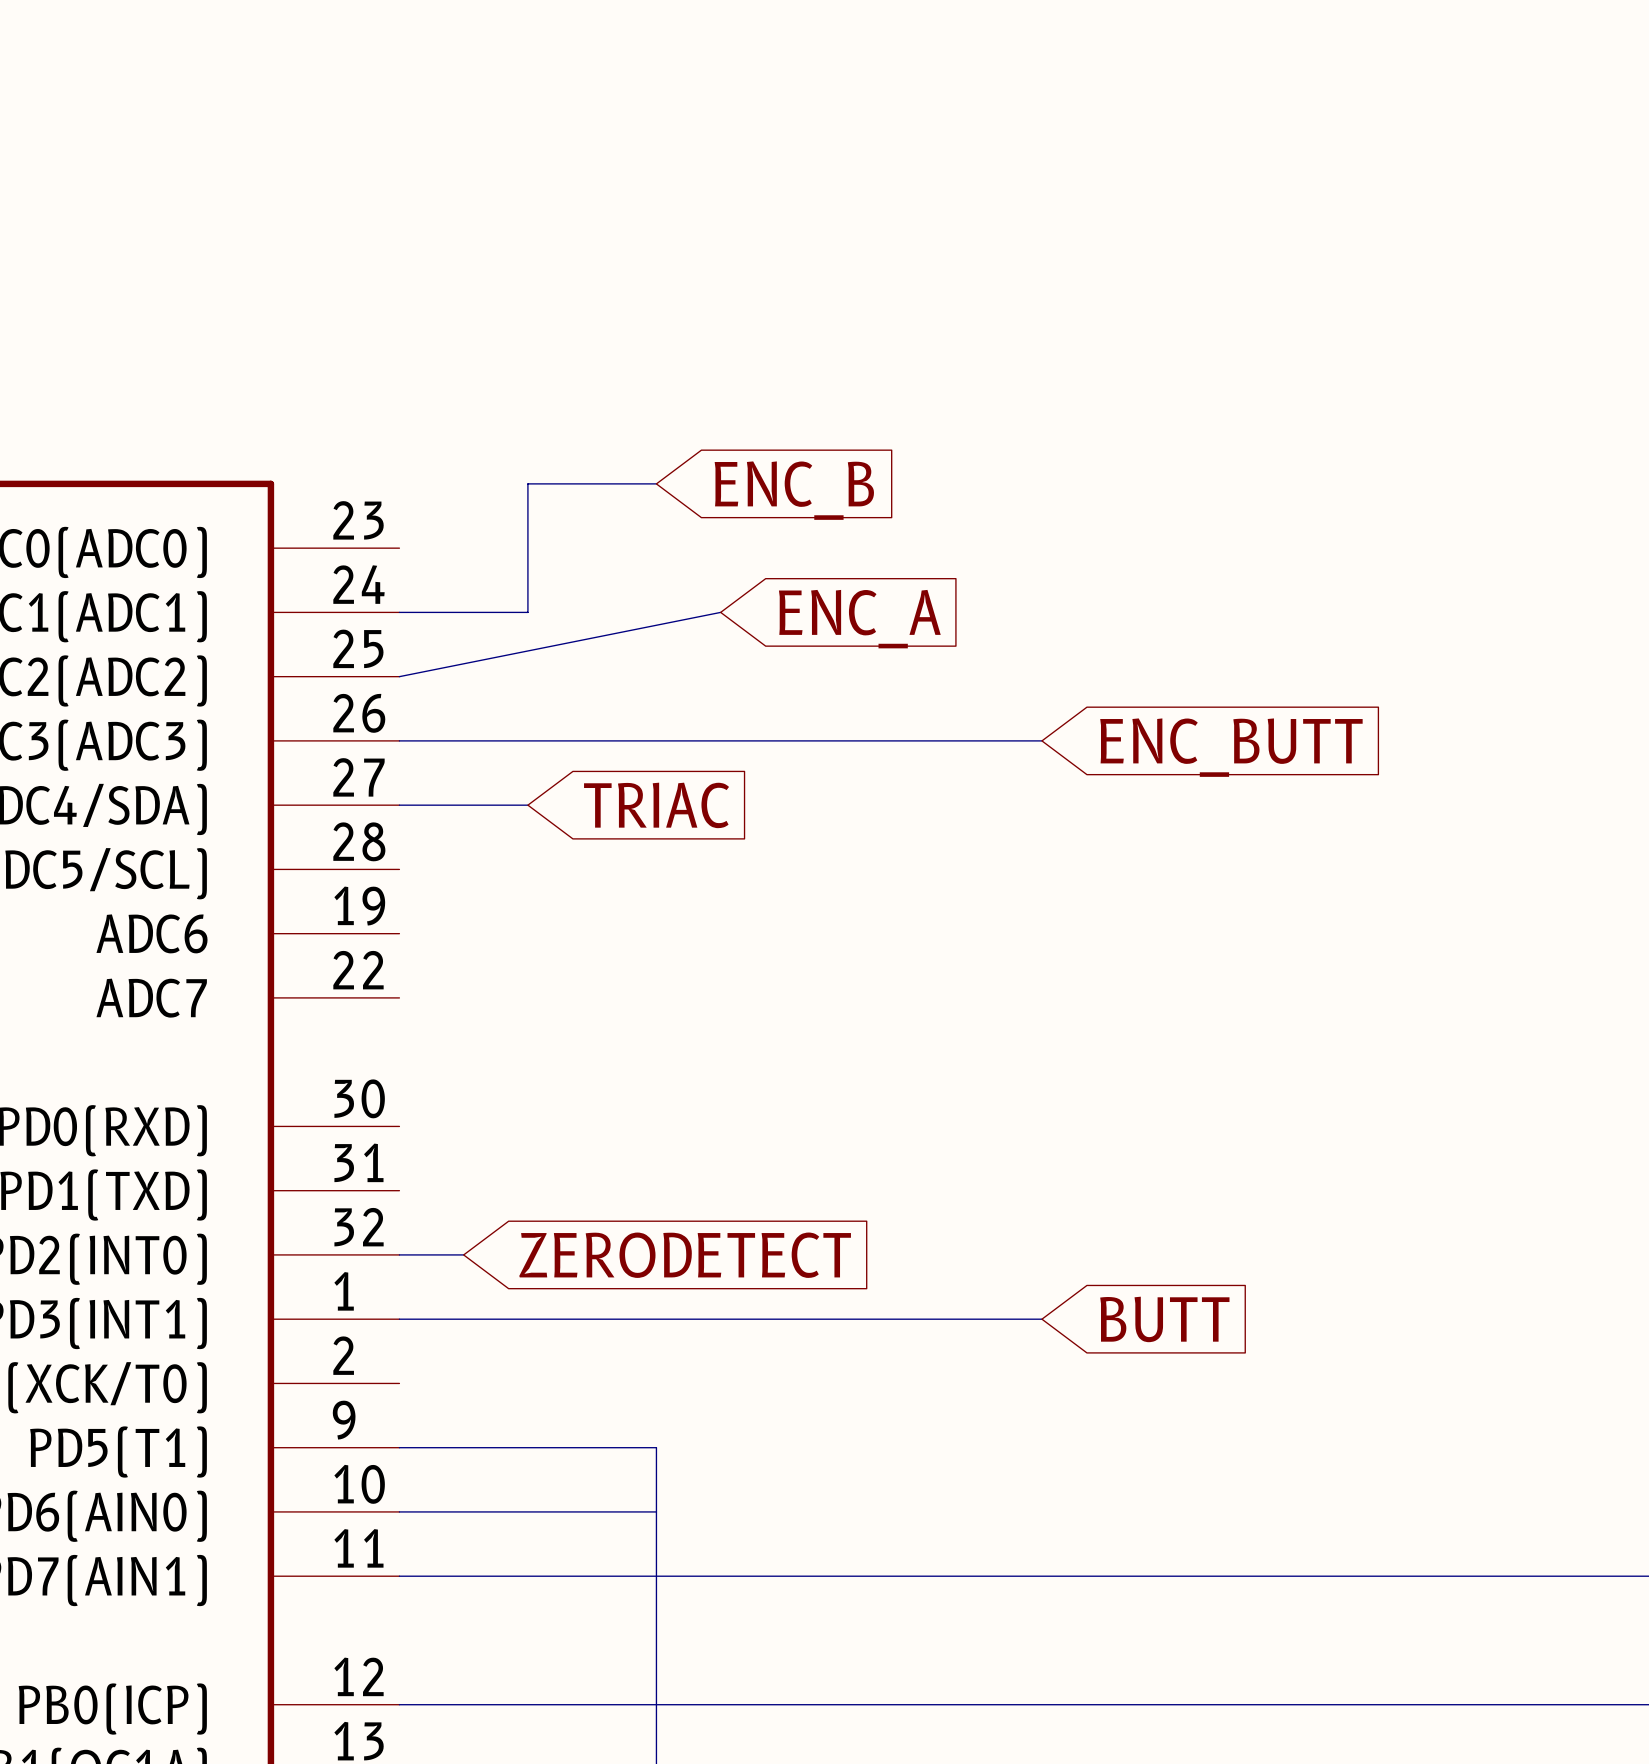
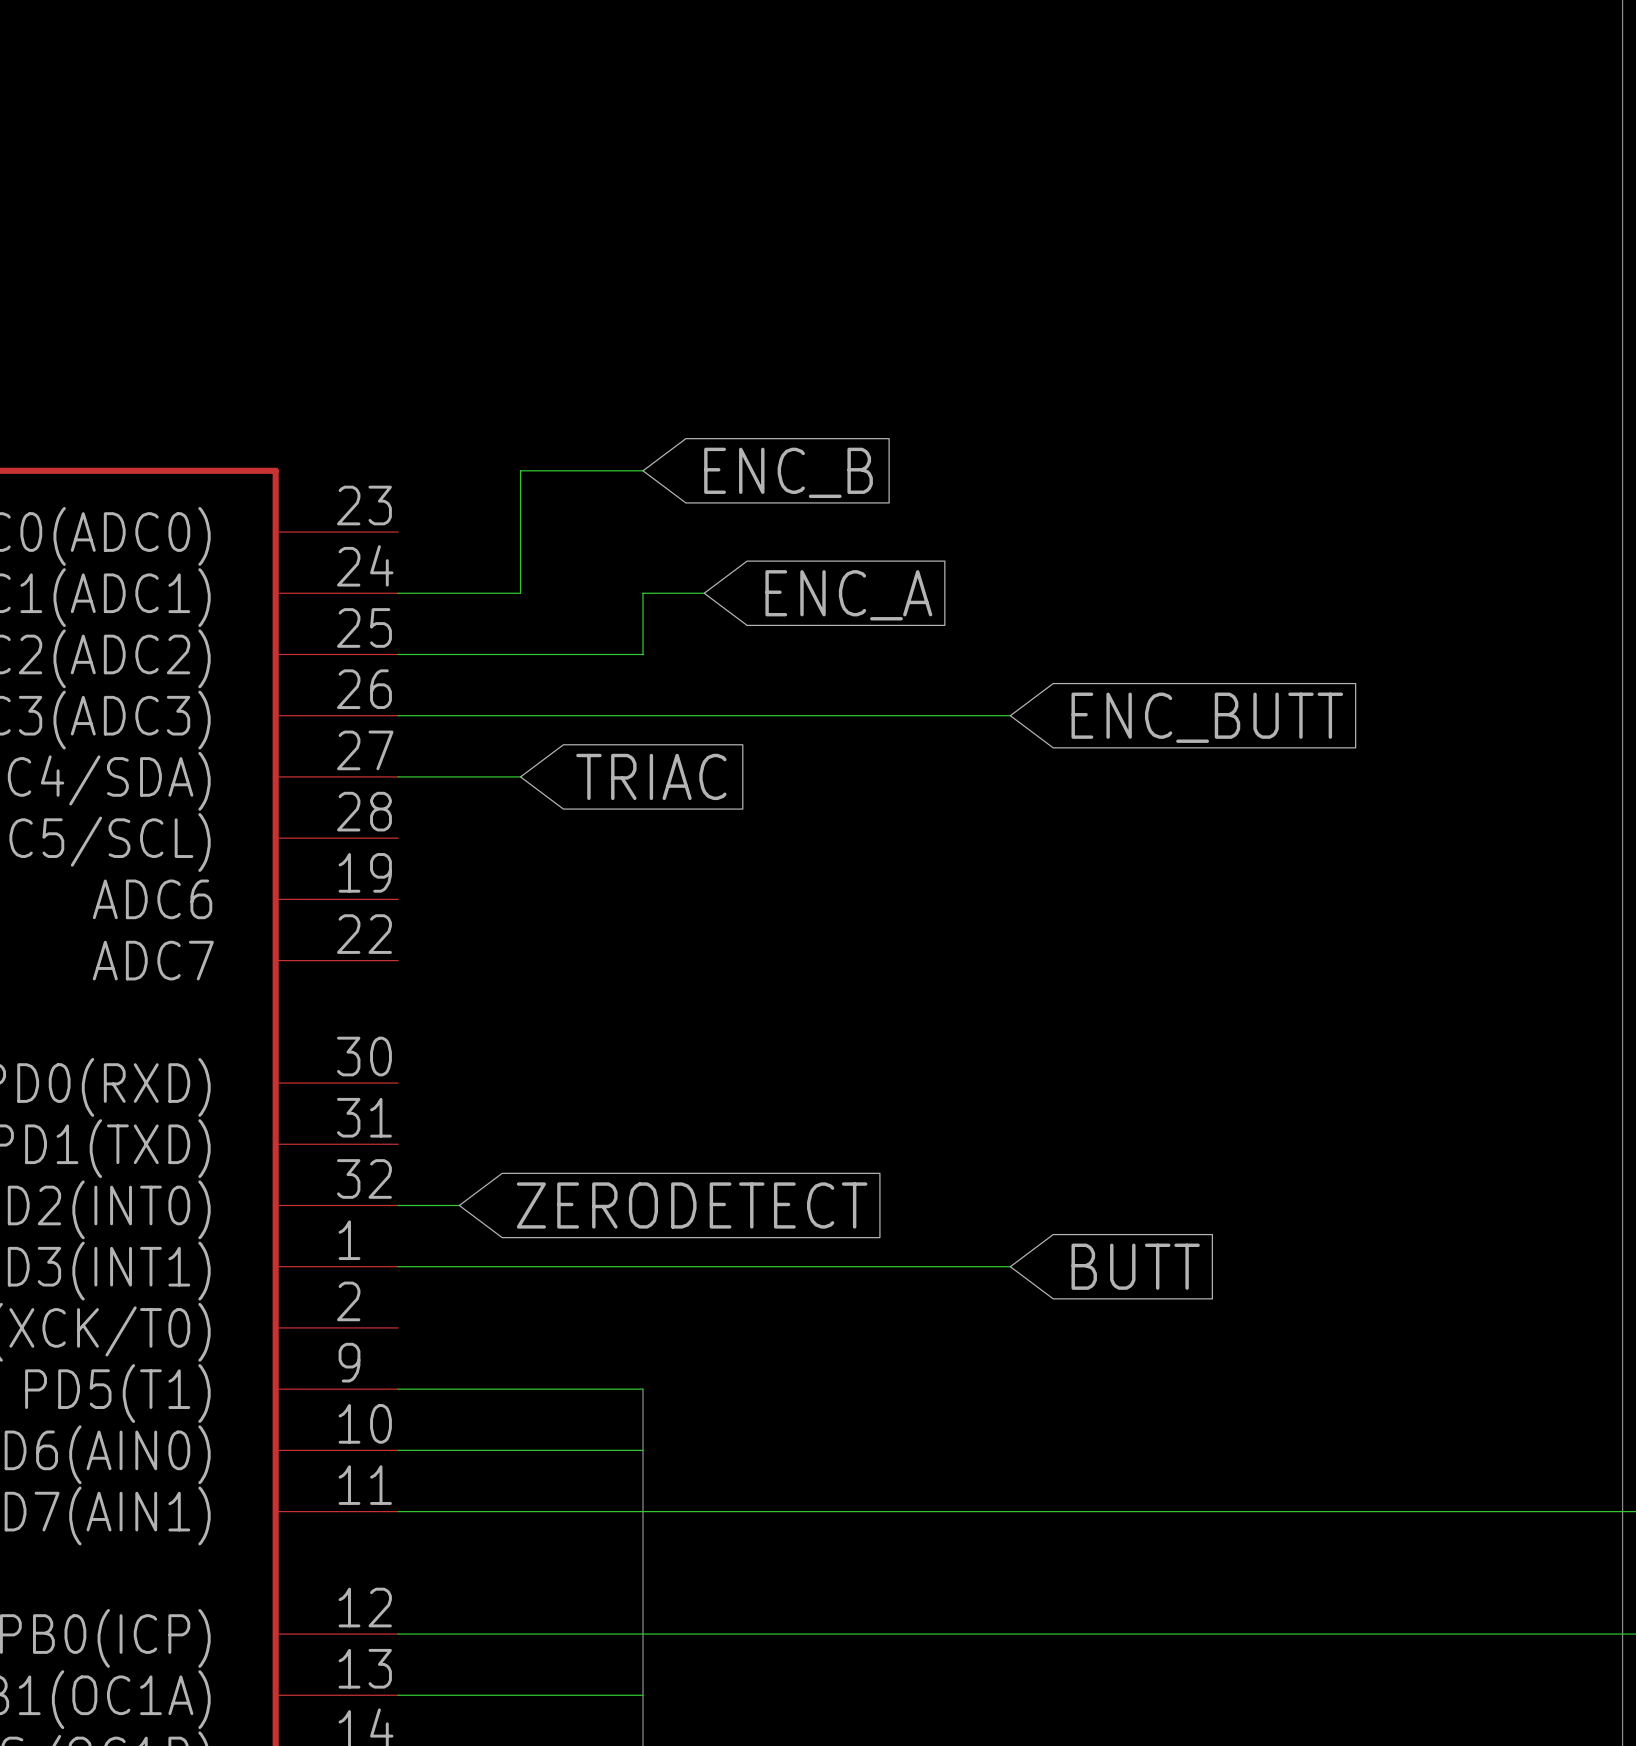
wire: (720, 612) (399, 676) -> (704, 593) (643, 593) (643, 654) (398, 654)

